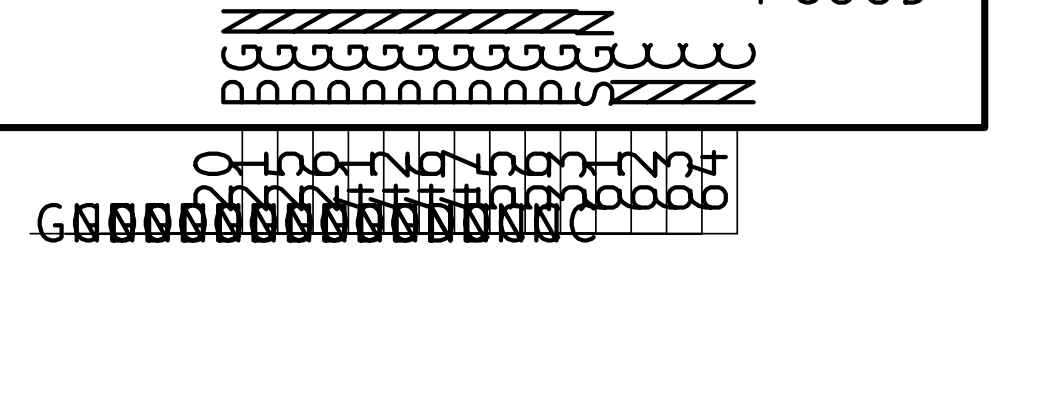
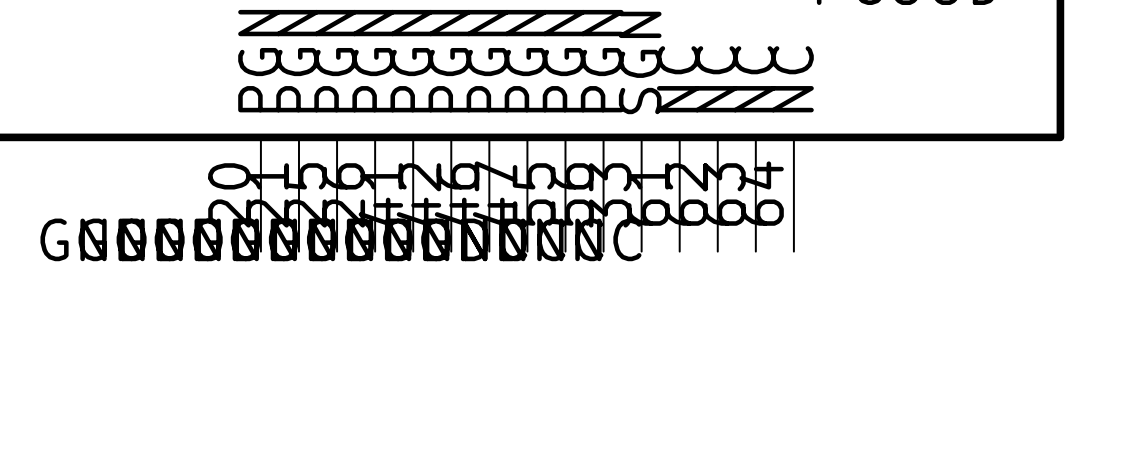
wire: (30, 233) (737, 233) -> none

